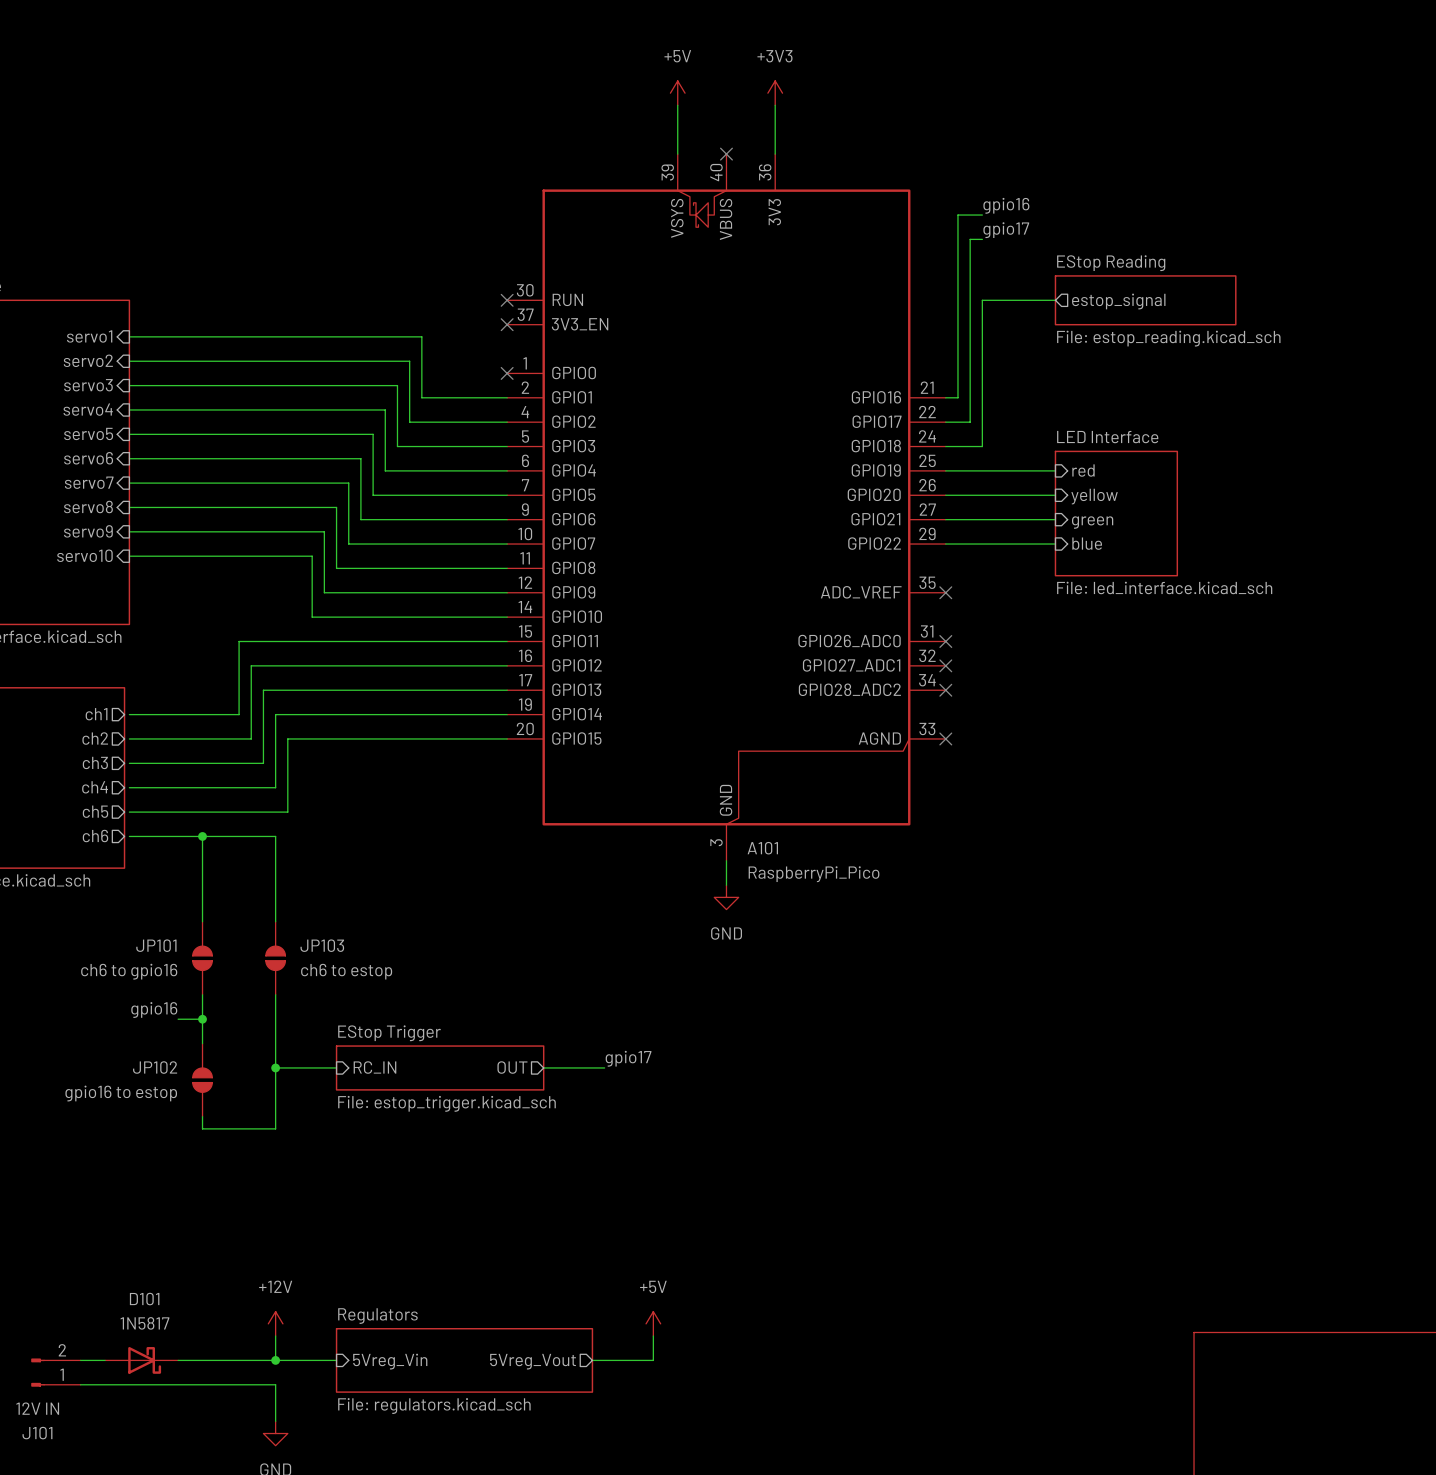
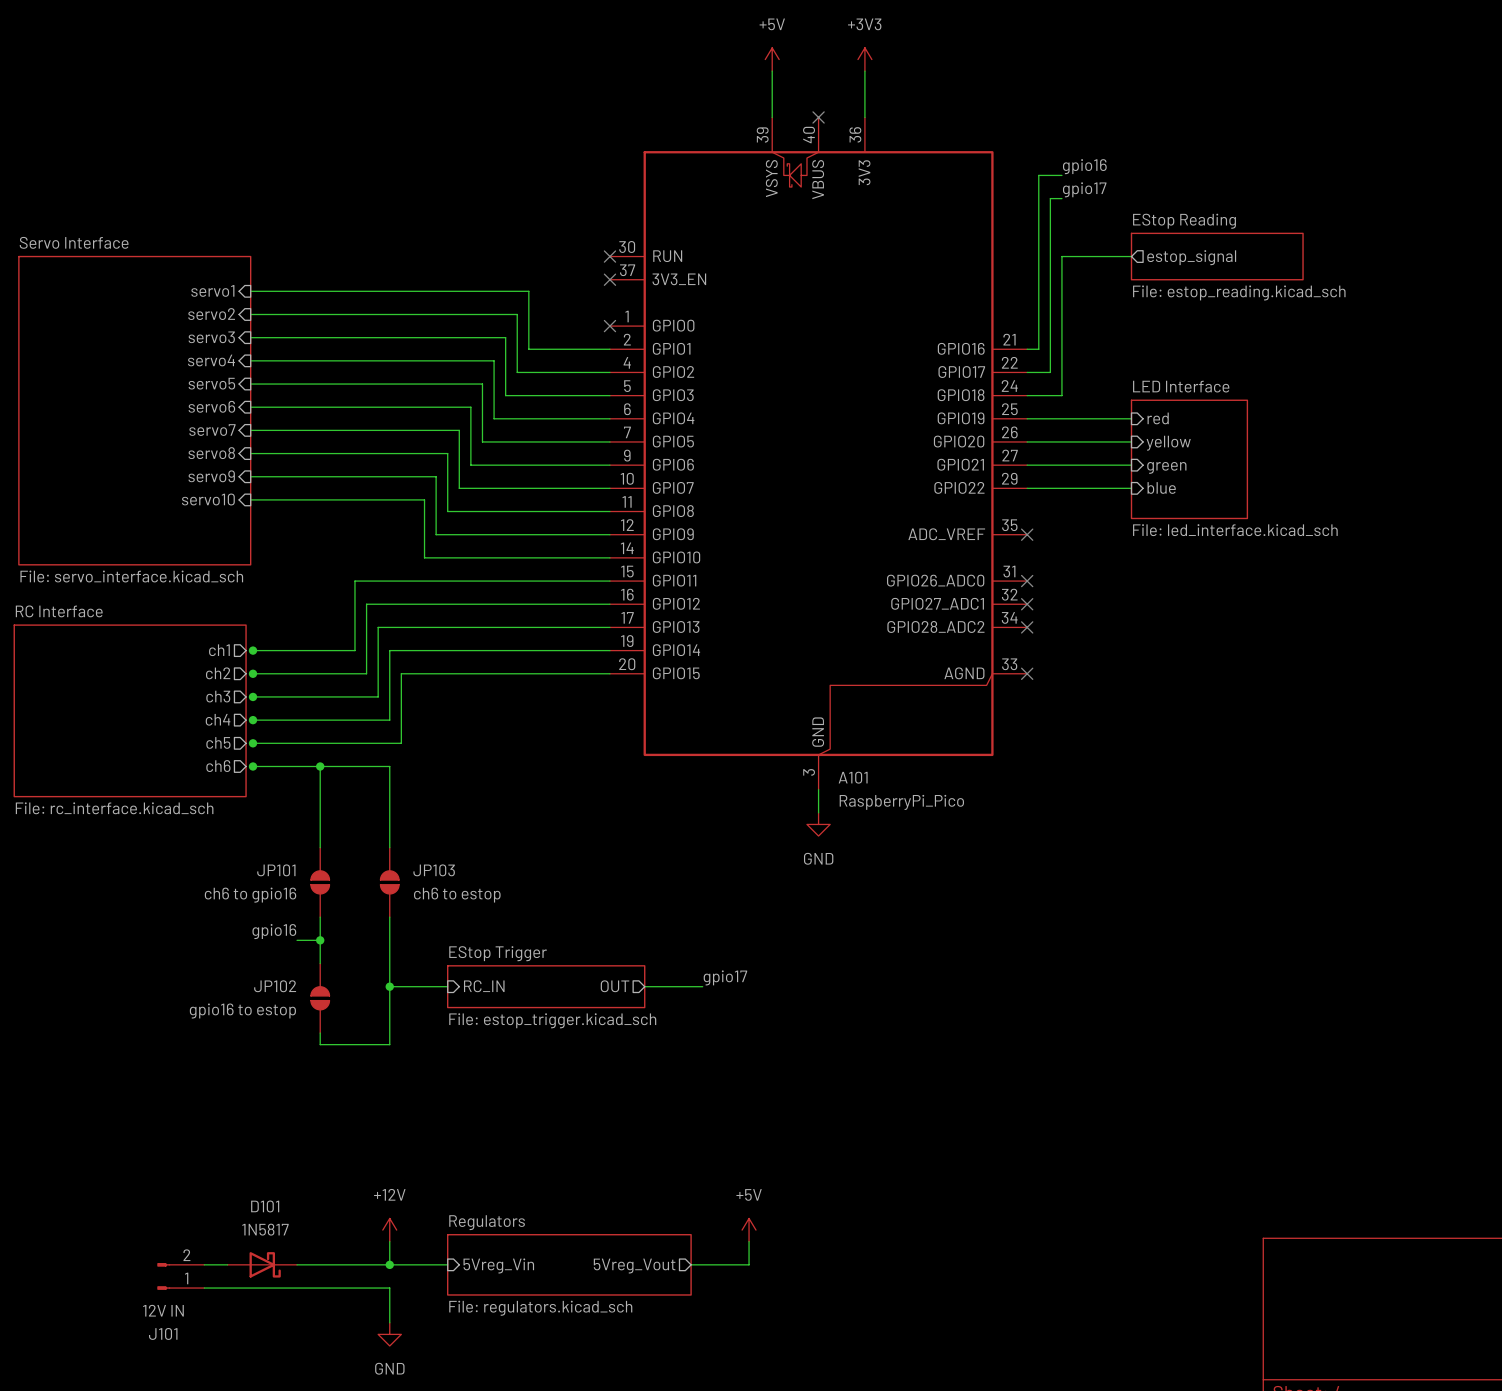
junction: none -> (252, 650)
junction: none -> (252, 673)
junction: none -> (252, 696)
junction: none -> (252, 720)
junction: none -> (252, 743)
junction: none -> (252, 766)

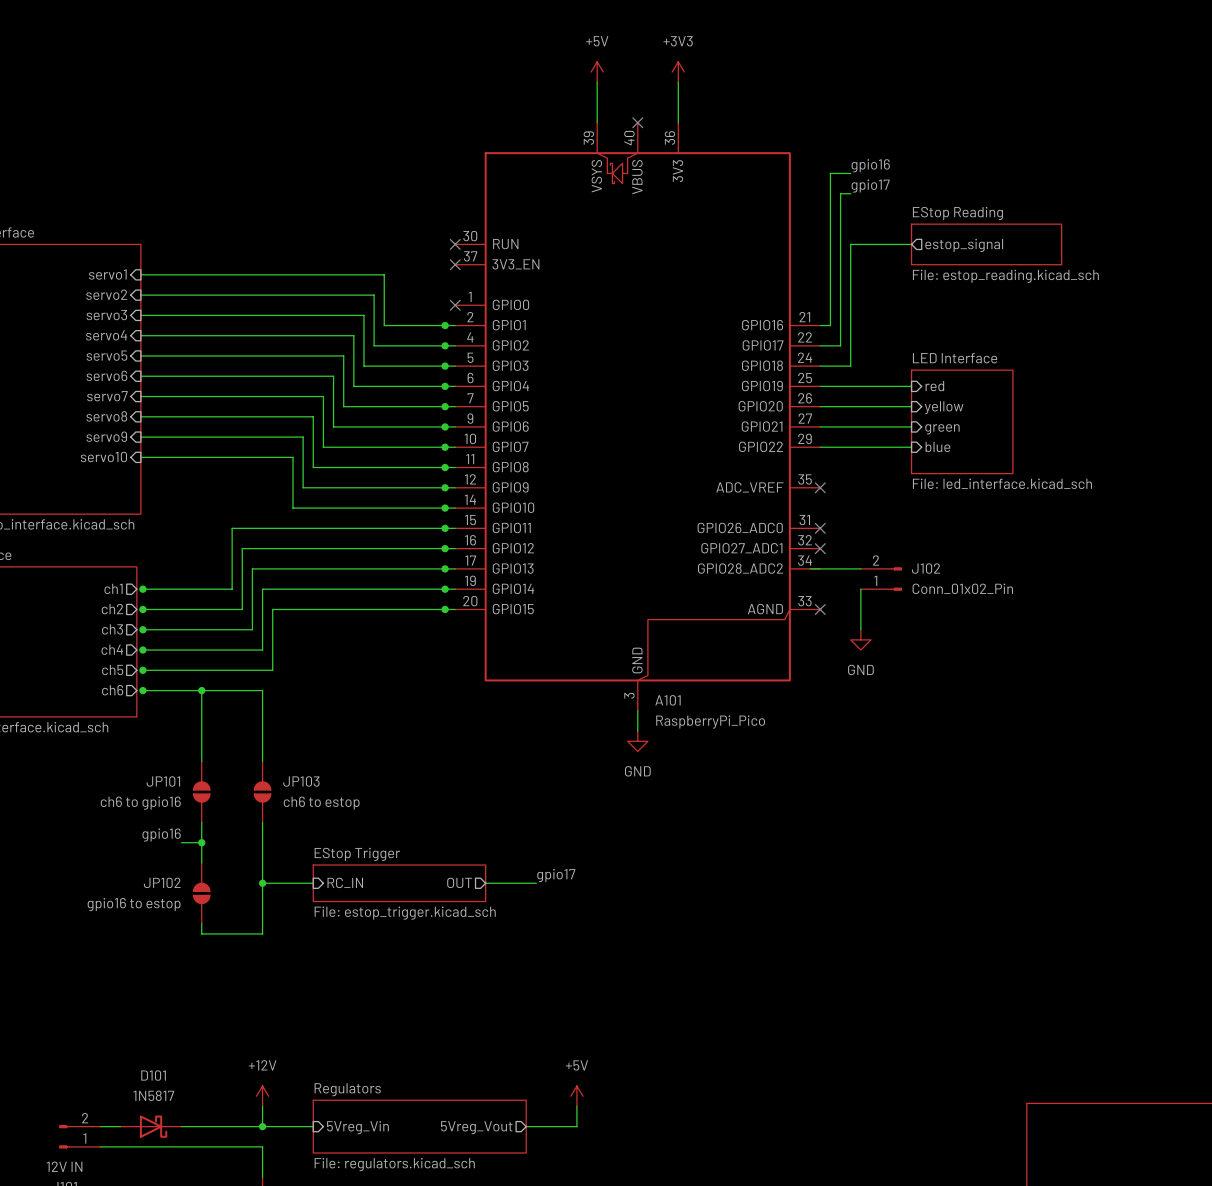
junction: none -> (445, 325)
junction: none -> (445, 345)
junction: none -> (445, 366)
junction: none -> (445, 386)
junction: none -> (445, 406)
junction: none -> (445, 426)
junction: none -> (445, 447)
junction: none -> (445, 467)
junction: none -> (445, 487)
junction: none -> (445, 508)
junction: none -> (445, 528)
junction: none -> (445, 548)
junction: none -> (445, 568)
wire: none -> (810, 568) (860, 568)
no-connect mark: (1027, 627) -> none
J102: none -> Conn_01x02_Pin (881, 579)
junction: none -> (445, 589)
wire: none -> (860, 589) (860, 629)
junction: none -> (445, 609)
power symbol: none -> GND (860, 639)

